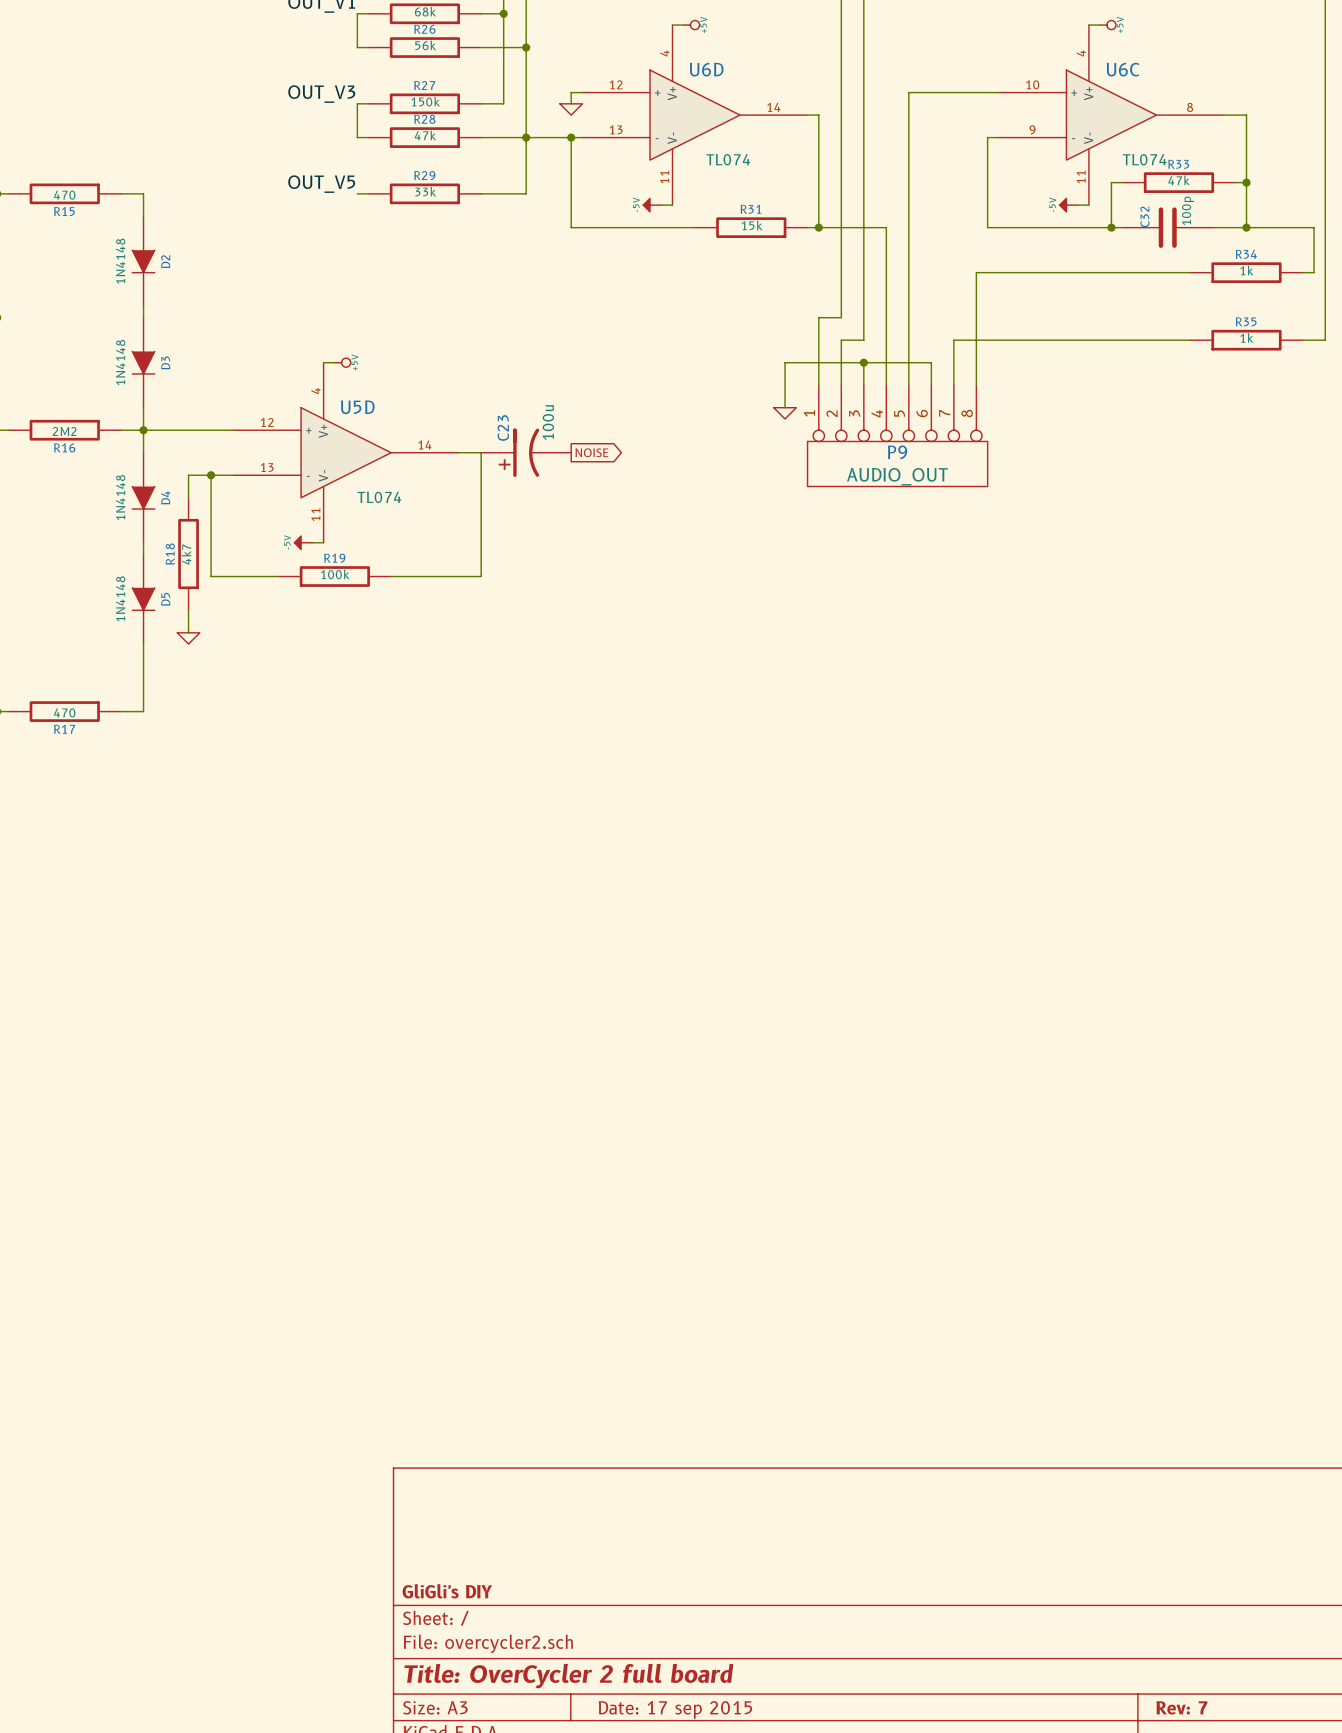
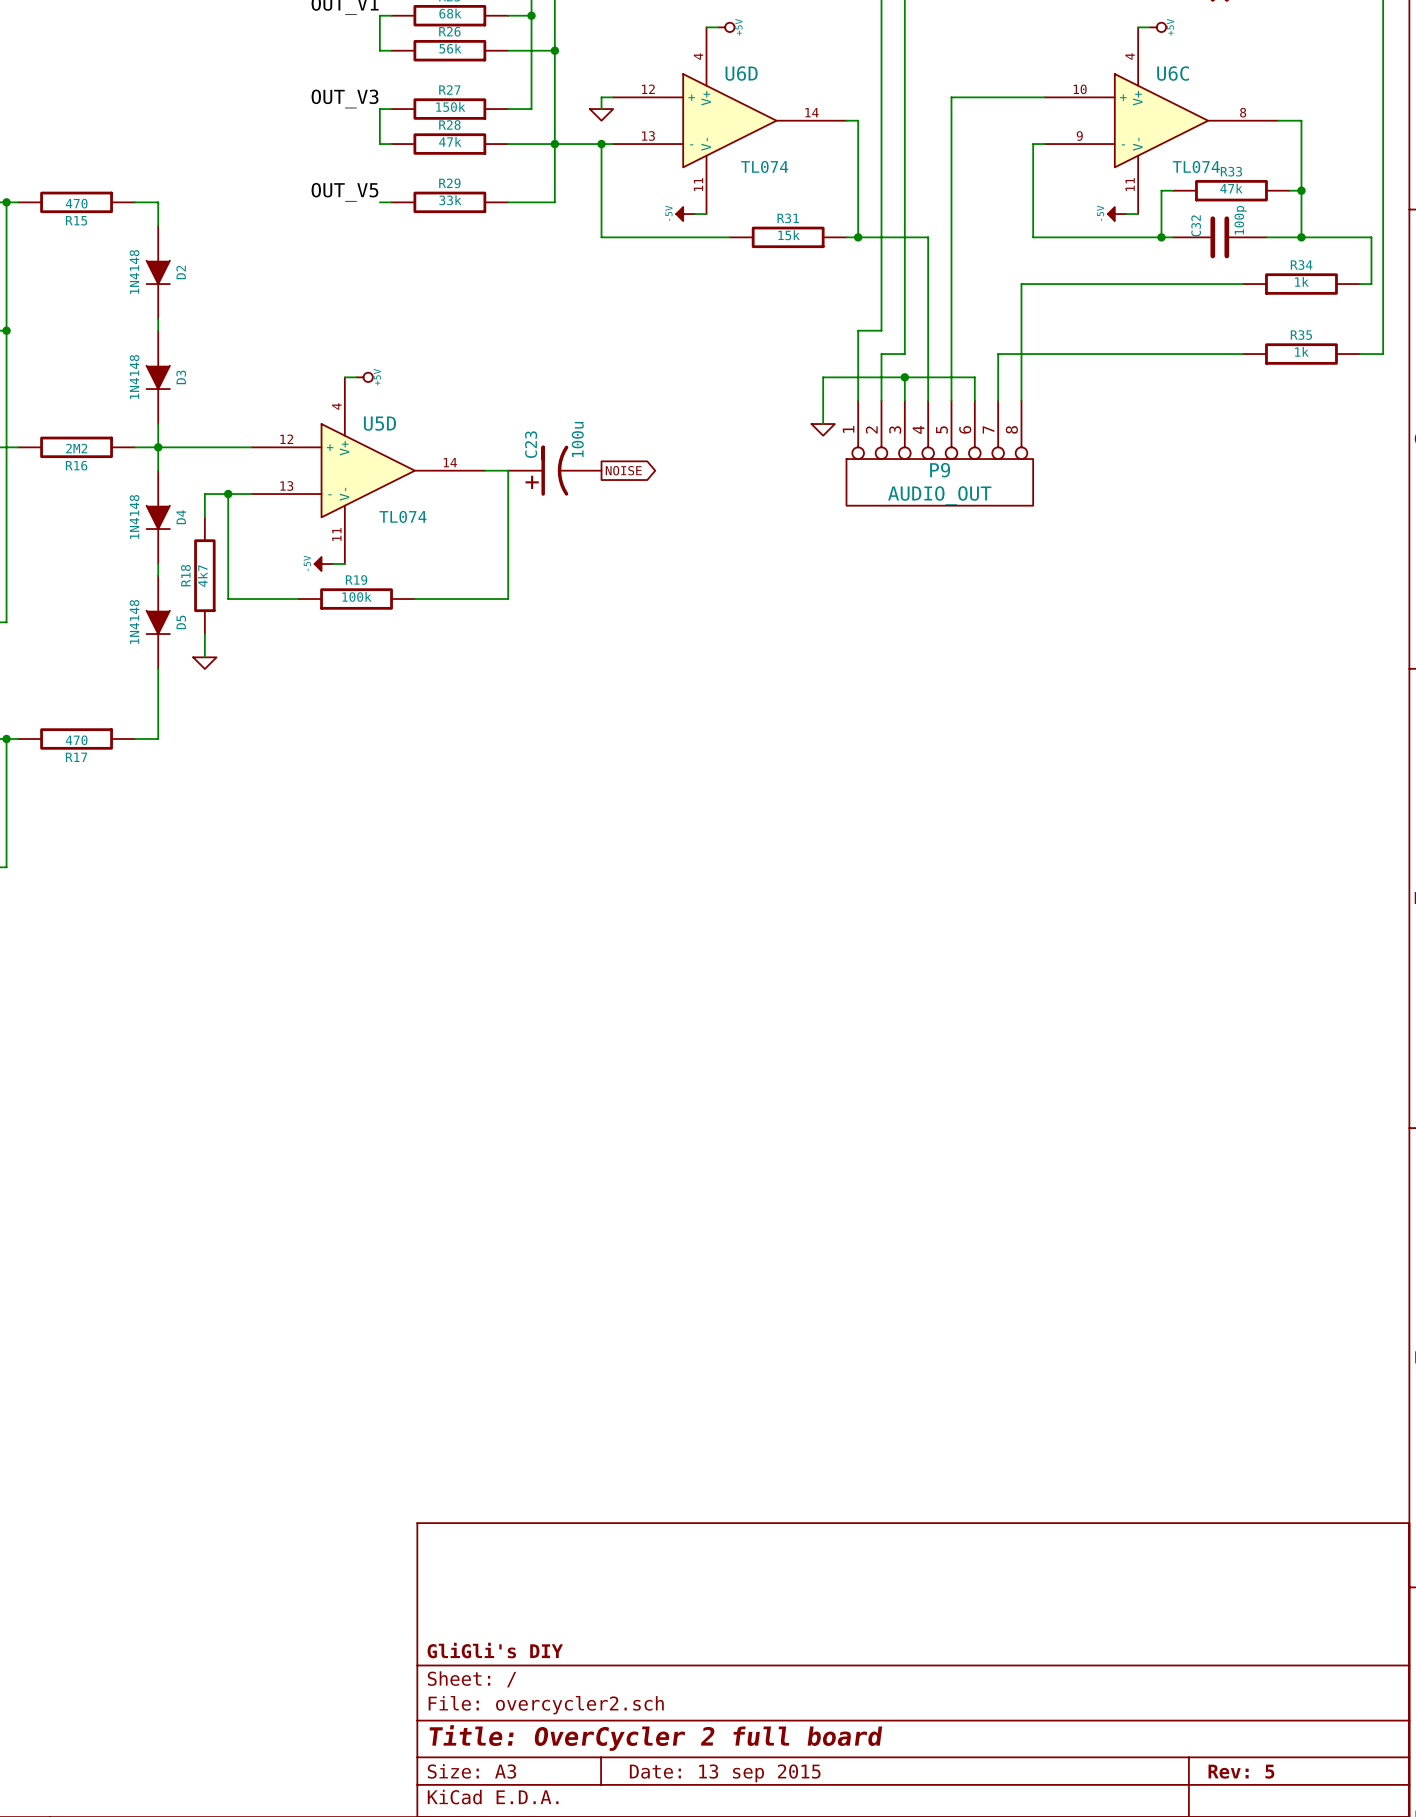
title block: Rev: 7 (1181, 1707) -> Rev: 5 (1241, 1771)
title block: Date: 17 sep 2015 (675, 1709) -> Date: 13 sep 2015 (725, 1773)

